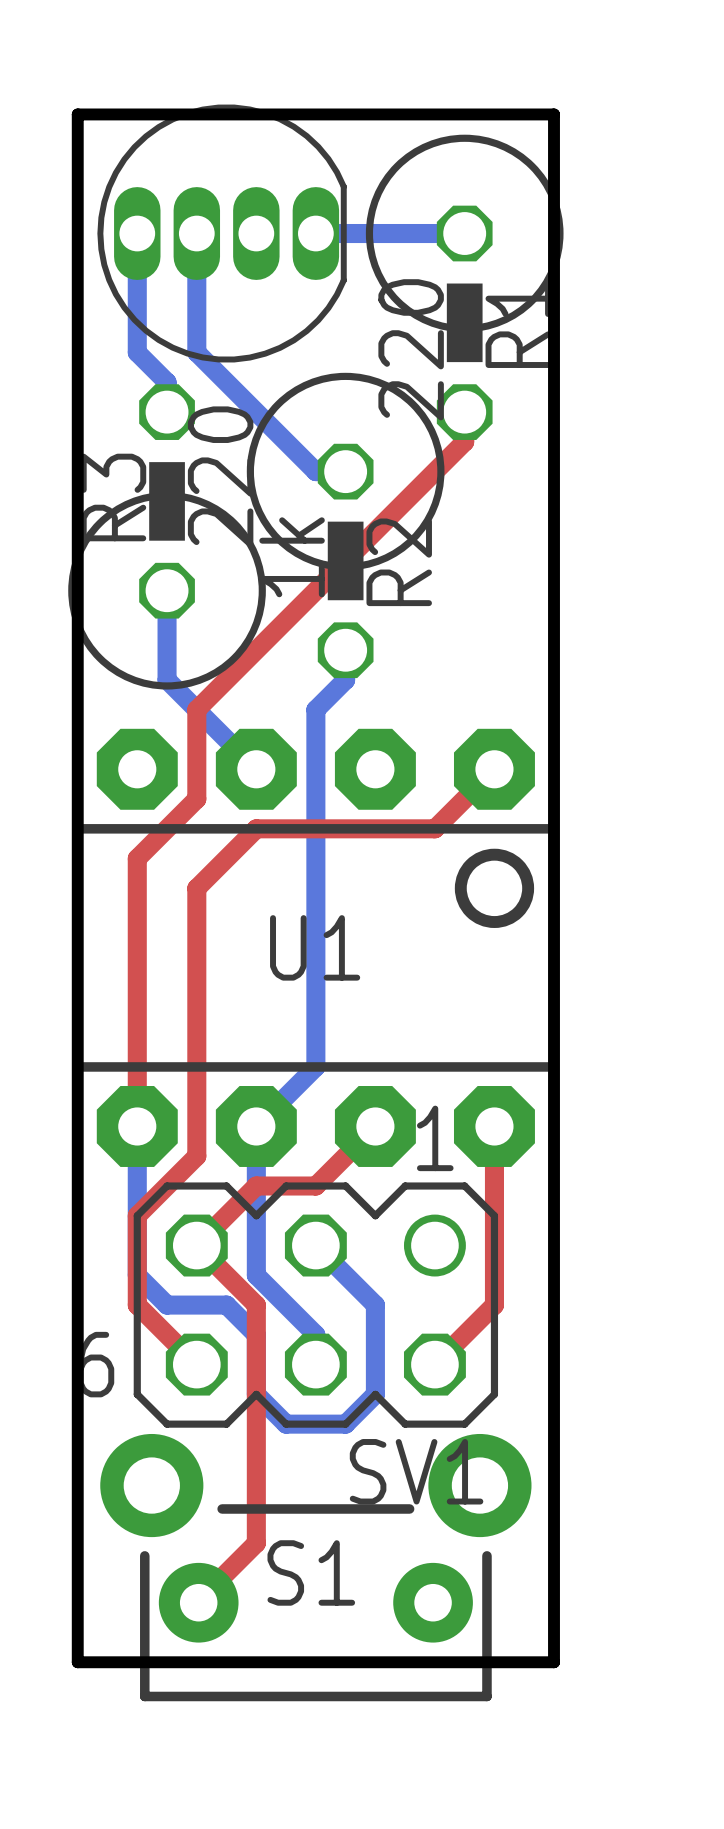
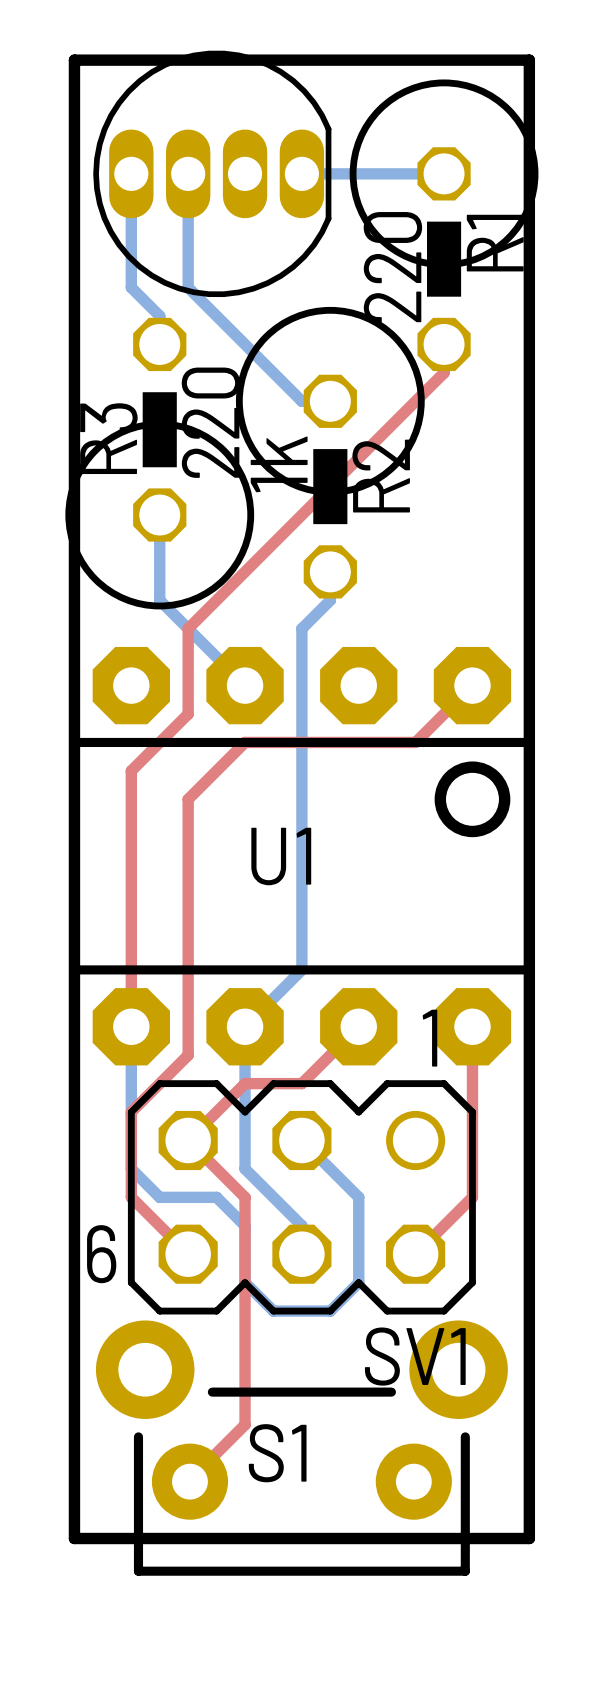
bottom track width: thick (137, 233) (137, 352) (167, 382) (167, 412) -> thin (131, 173) (131, 287) (159, 316) (159, 344)
bottom track width: thick (196, 233) (196, 352) (315, 471) (345, 471) -> thin (188, 173) (188, 287) (301, 401) (330, 401)
bottom track width: thick (315, 233) (464, 233) -> thin (301, 173) (444, 173)
top track width: thick (464, 412) (464, 441) (196, 709) (196, 799) (137, 858) (137, 1126) -> thin (444, 344) (444, 372) (188, 628) (188, 714) (131, 770) (131, 1026)
bottom track width: thick (167, 590) (167, 680) (256, 769) -> thin (159, 515) (159, 600) (245, 685)
bottom track width: thick (345, 650) (345, 680) (315, 709) (315, 1066) (256, 1126) (256, 1275) (315, 1334) (315, 1364) -> thin (330, 571) (330, 600) (301, 628) (301, 969) (245, 1026) (245, 1168) (301, 1225) (301, 1254)
top track width: thick (494, 769) (434, 828) (256, 828) (196, 888) (196, 1156) (137, 1215) (137, 1305) (196, 1364) -> thin (472, 685) (415, 742) (245, 742) (188, 799) (188, 1055) (131, 1112) (131, 1197) (188, 1254)
bottom track width: thick (137, 1126) (137, 1275) (167, 1305) (226, 1305) (256, 1334) (256, 1394) (286, 1424) (345, 1424) (375, 1394) (375, 1305) (315, 1245) -> thin (131, 1026) (131, 1168) (159, 1197) (216, 1197) (245, 1225) (245, 1282) (273, 1311) (330, 1311) (358, 1282) (358, 1197) (301, 1140)
top track width: thick (375, 1126) (315, 1186) (256, 1186) (196, 1245) (256, 1305) (256, 1543) (198, 1602) -> thin (358, 1026) (301, 1083) (245, 1083) (188, 1140) (245, 1197) (245, 1424) (189, 1481)
top track width: thick (494, 1126) (494, 1305) (434, 1364) -> thin (472, 1026) (472, 1197) (415, 1254)

